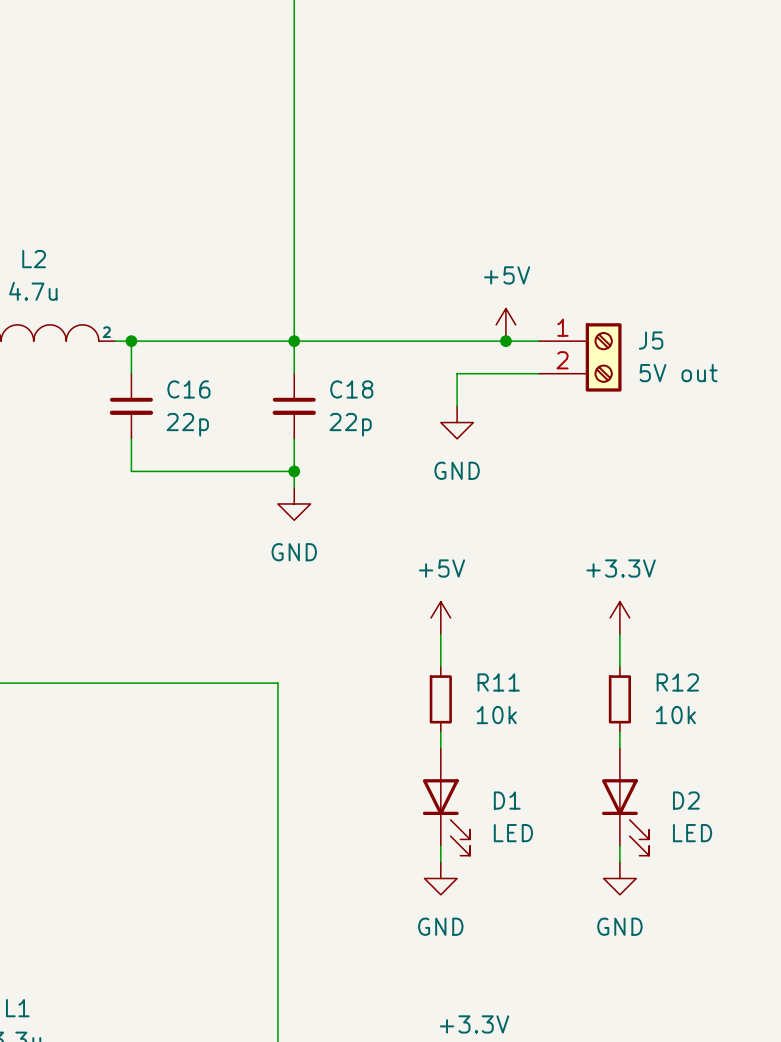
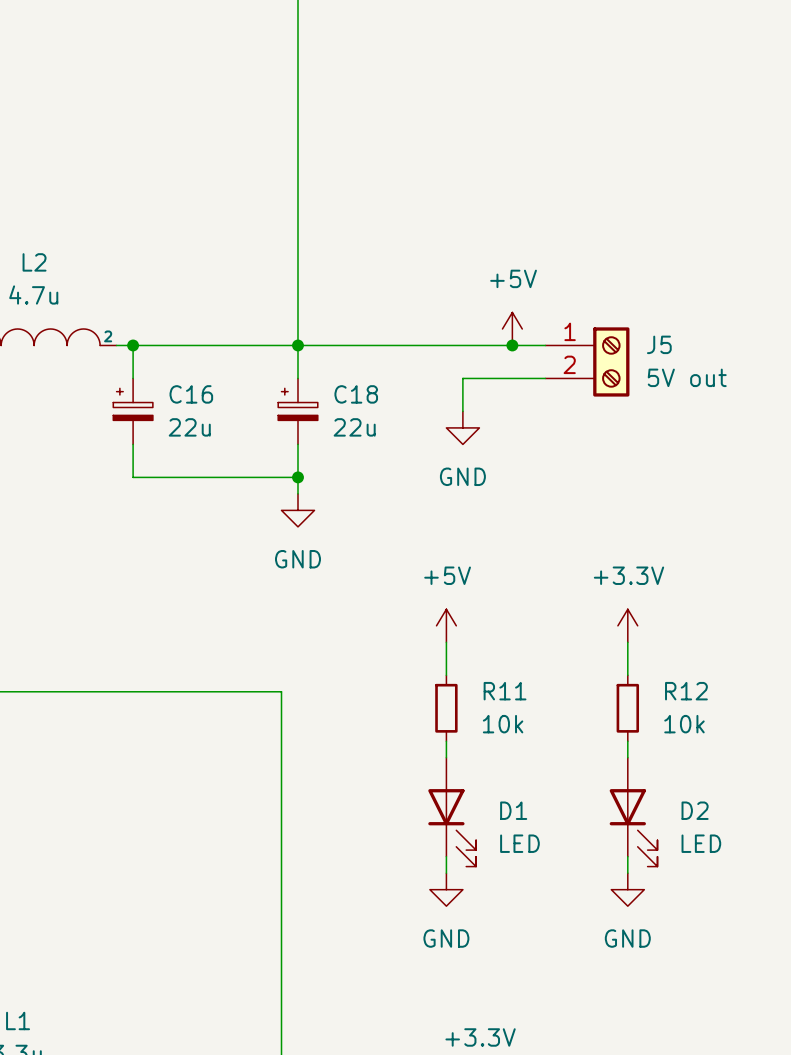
C16 symbol: [109, 373, 154, 439] -> [113, 378, 153, 445]
C18 symbol: [272, 373, 316, 439] -> [278, 378, 318, 445]
C16 value: 22p (187, 424) -> 22u (189, 427)
C18 value: 22p (350, 424) -> 22u (354, 427)

